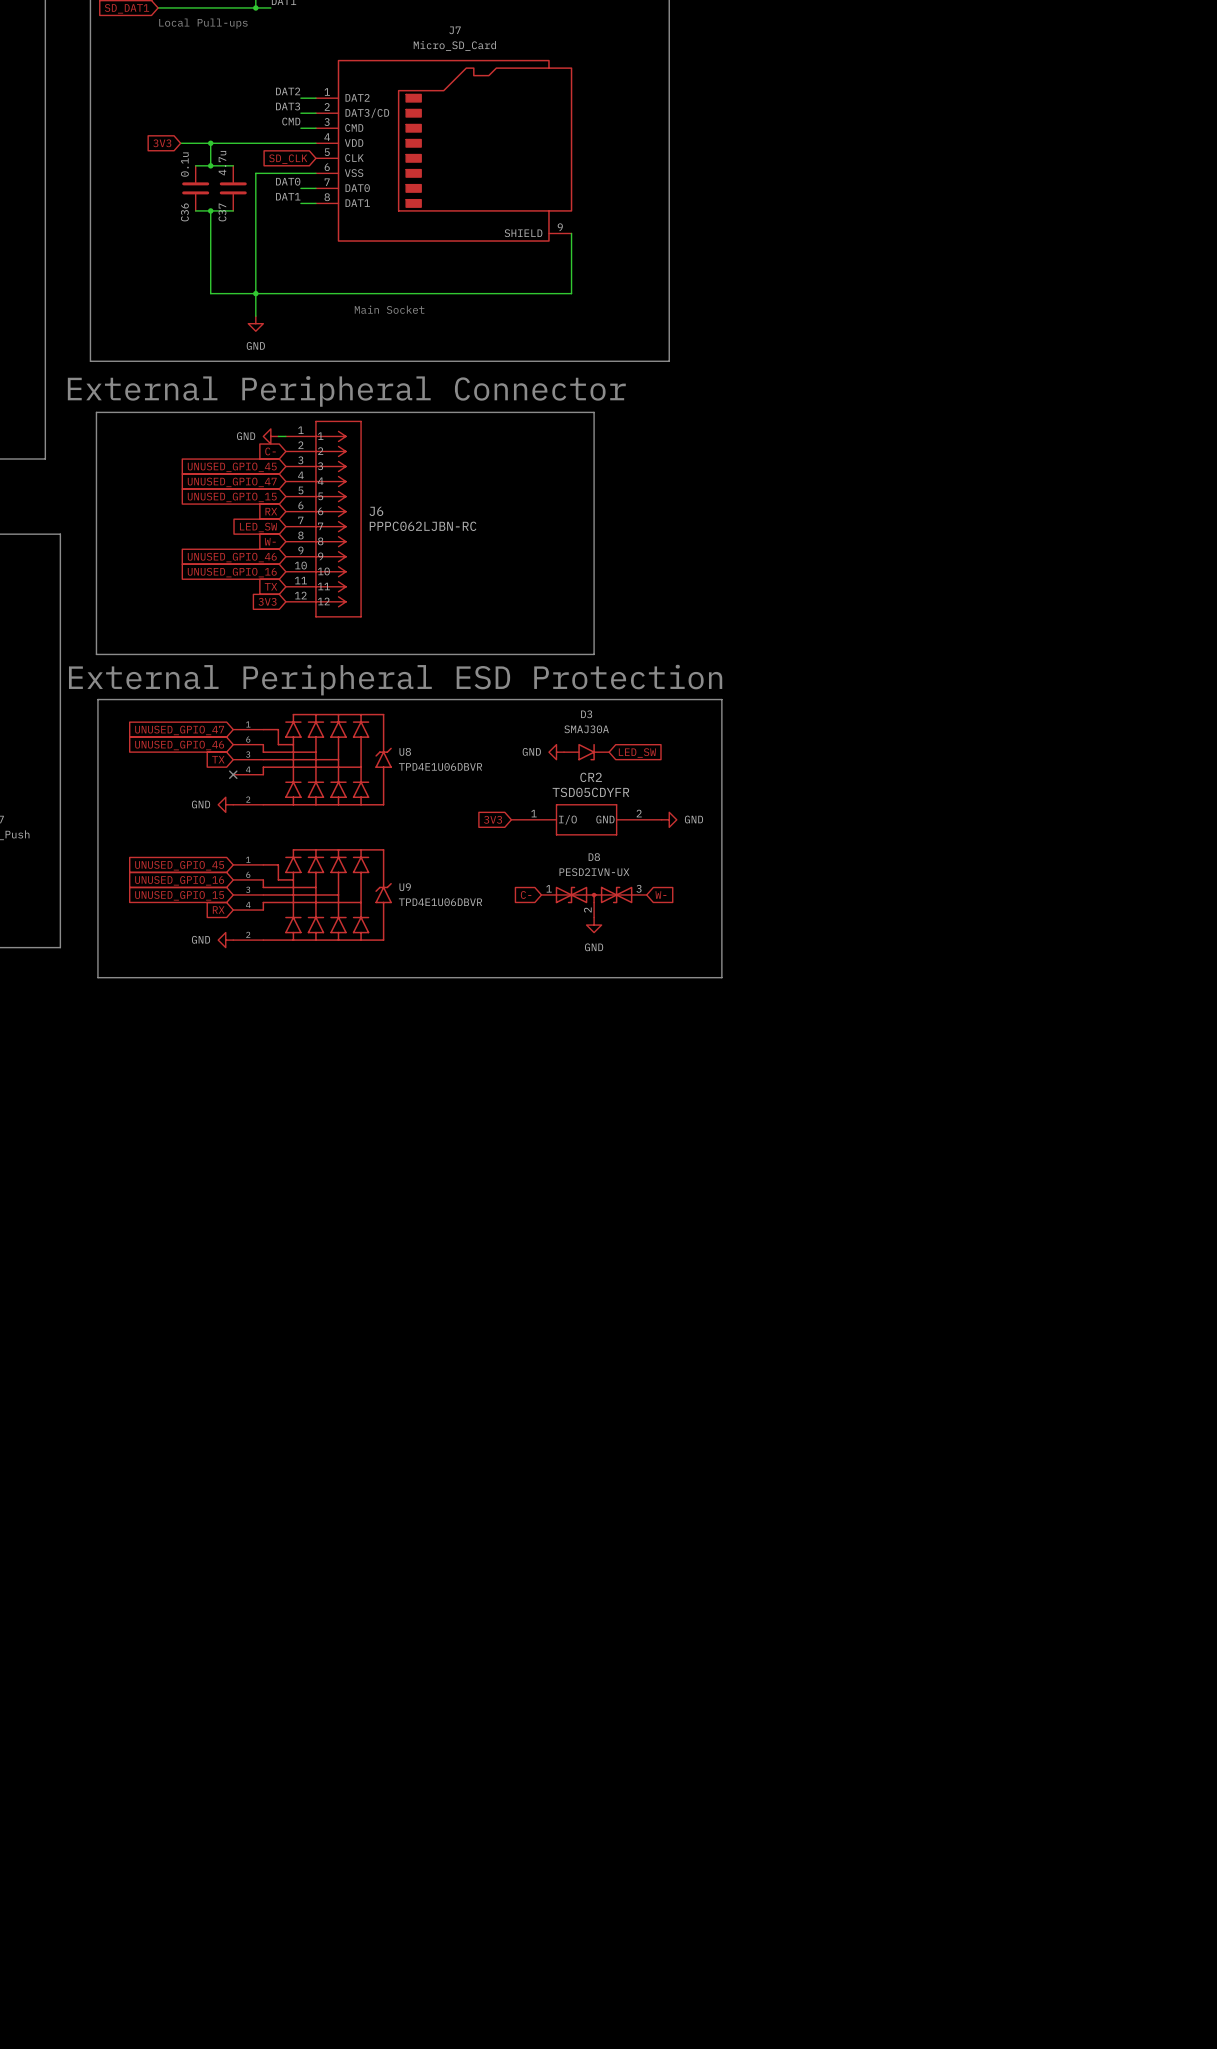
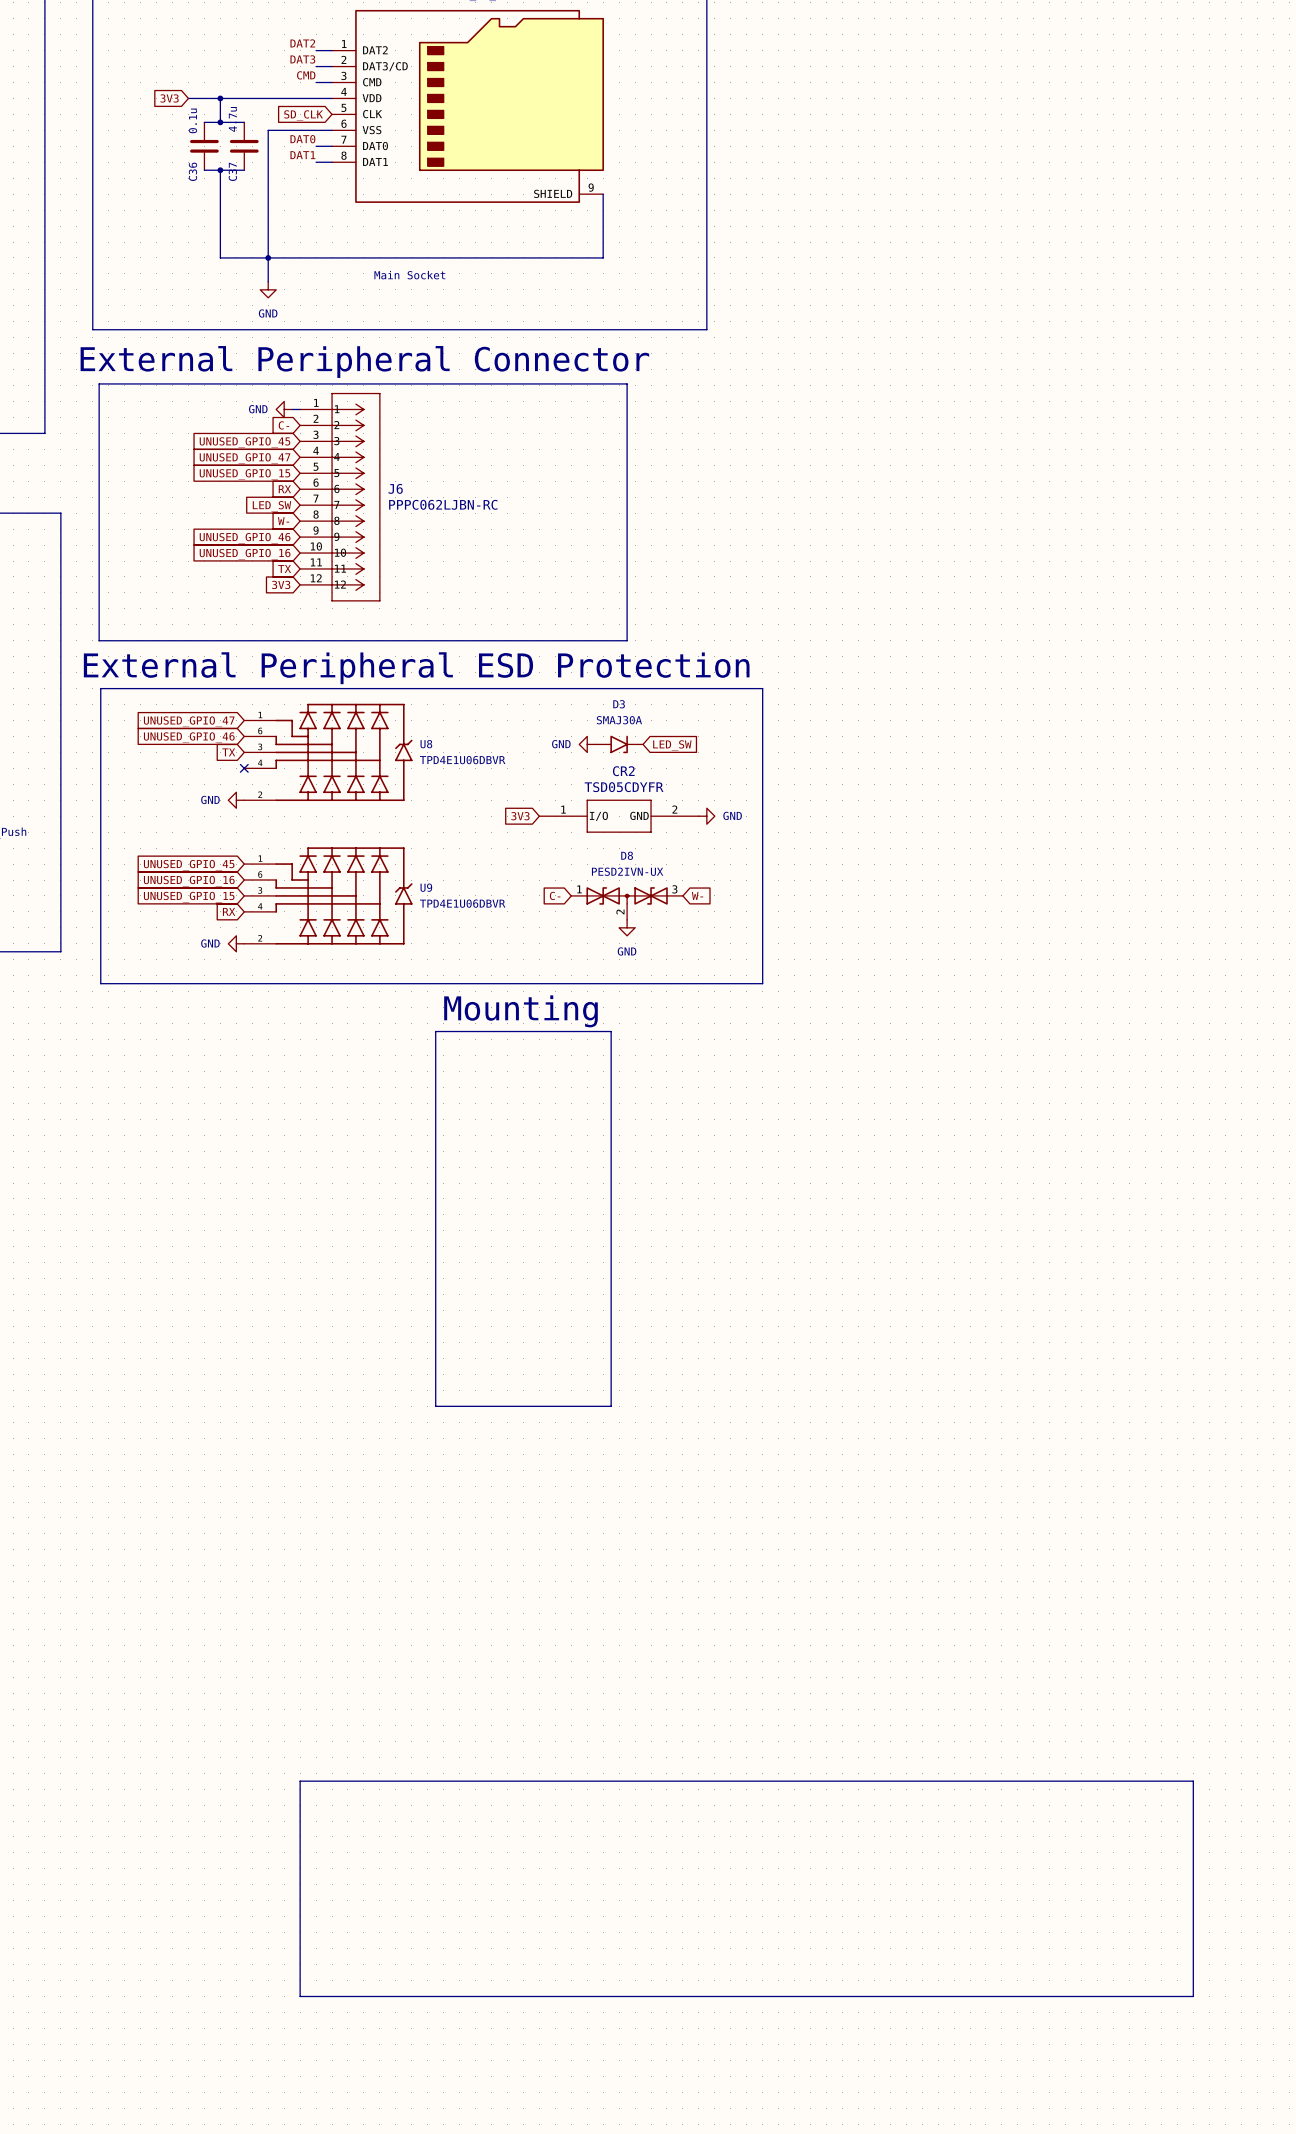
text: none -> Mounting (520, 1011)
line: none -> (435, 1031) (611, 1031) (611, 1406) (435, 1406) (435, 1031)
line: none -> (300, 1781) (1193, 1781) (1193, 1996) (300, 1996) (300, 1781)

